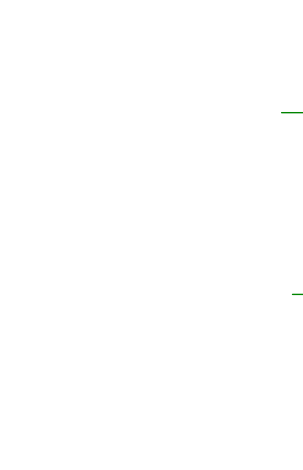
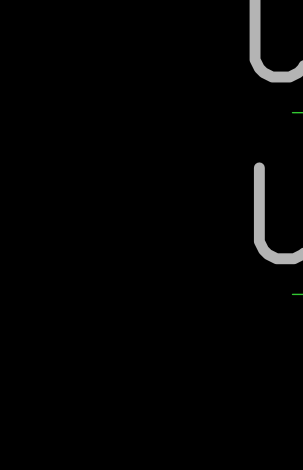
wire: (281, 112) (292, 112) -> none

